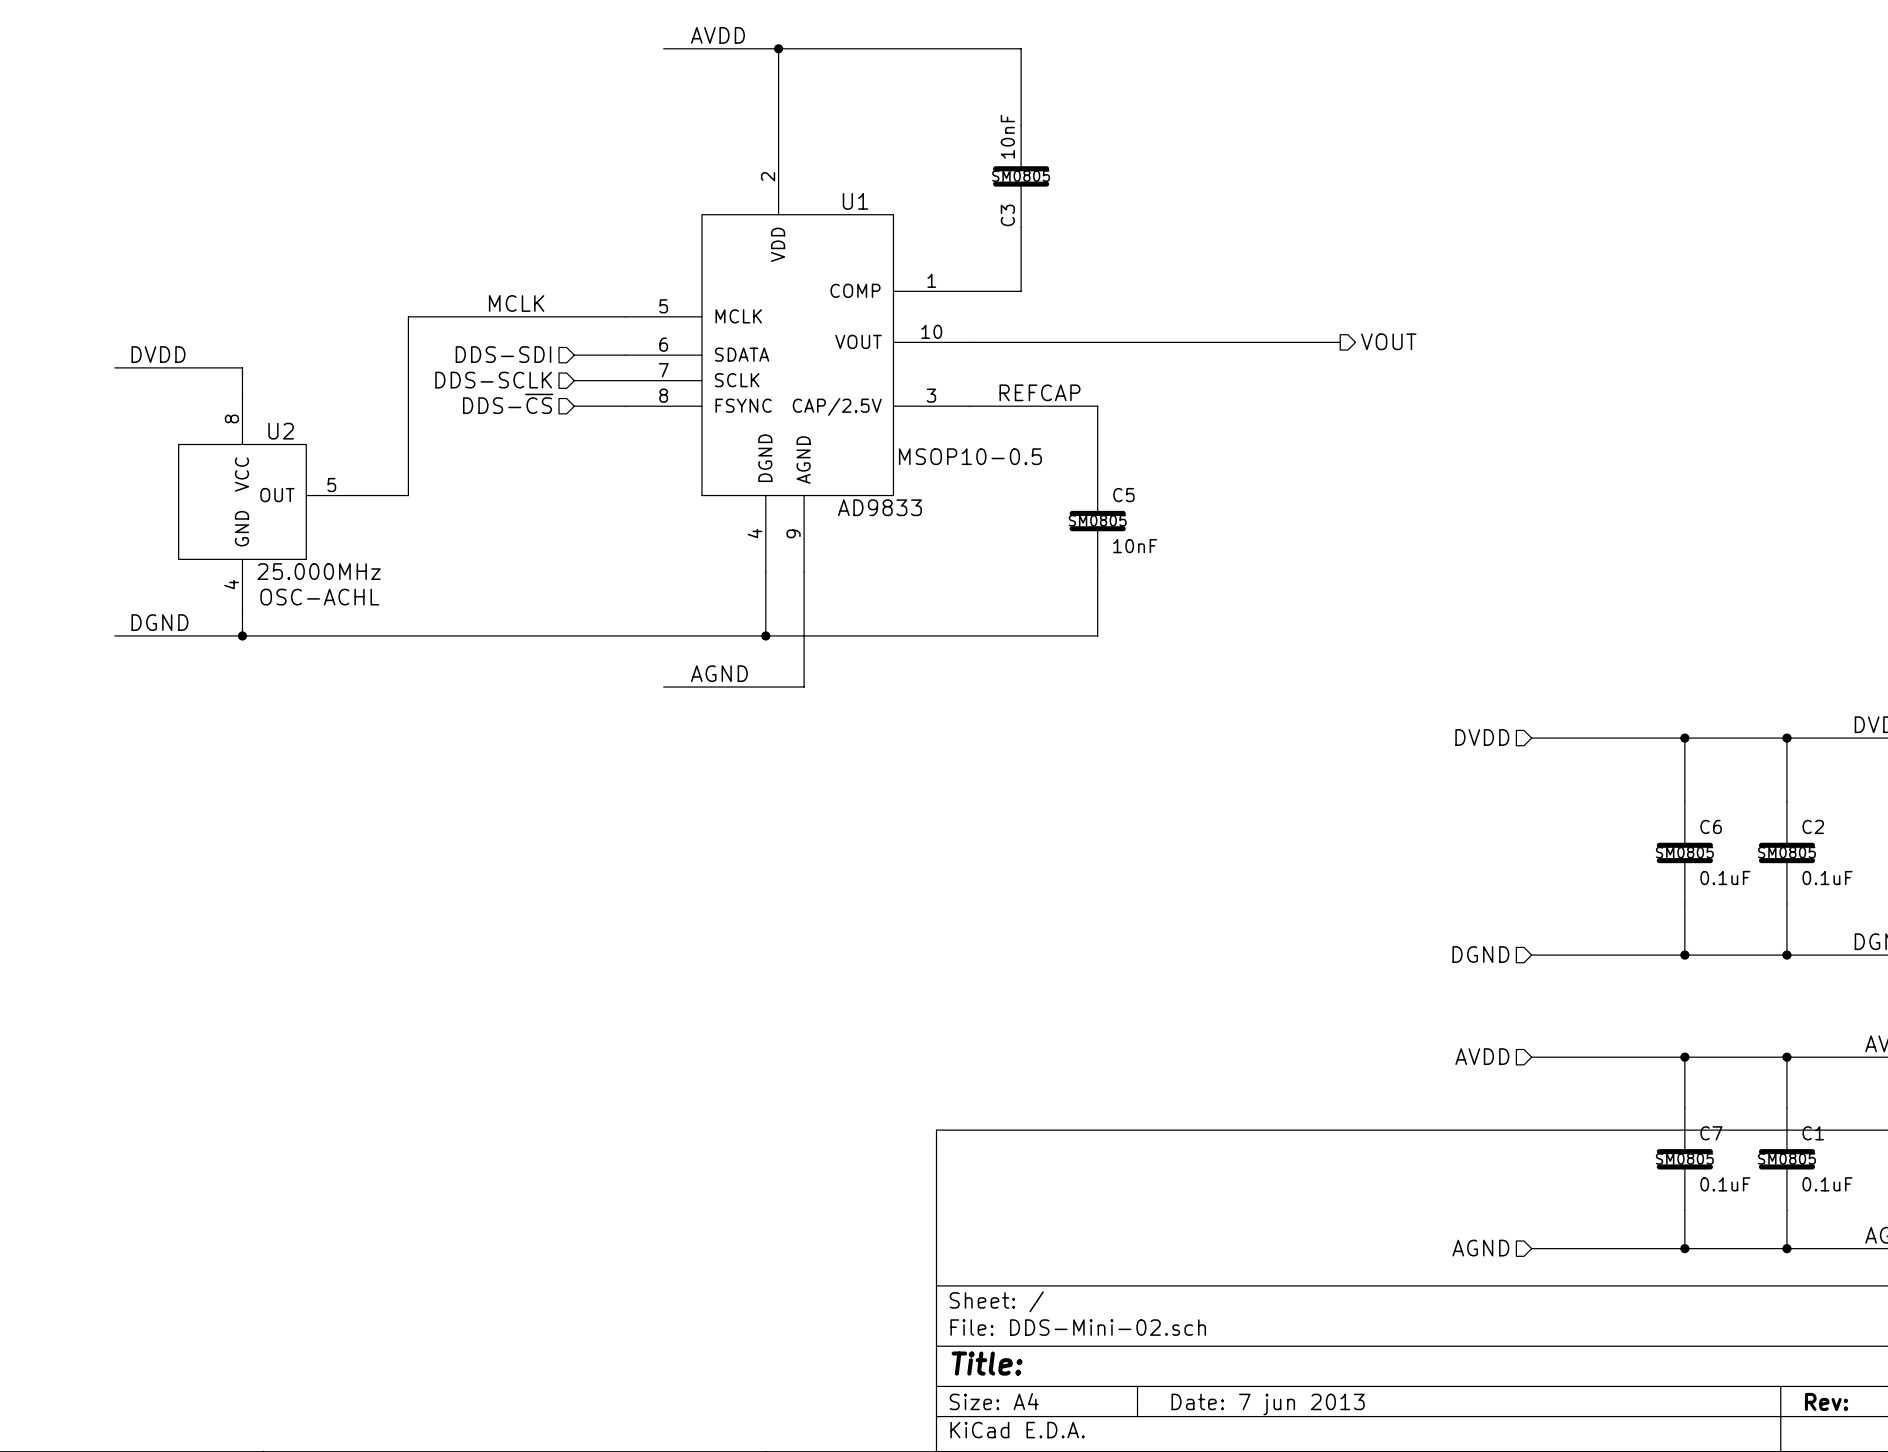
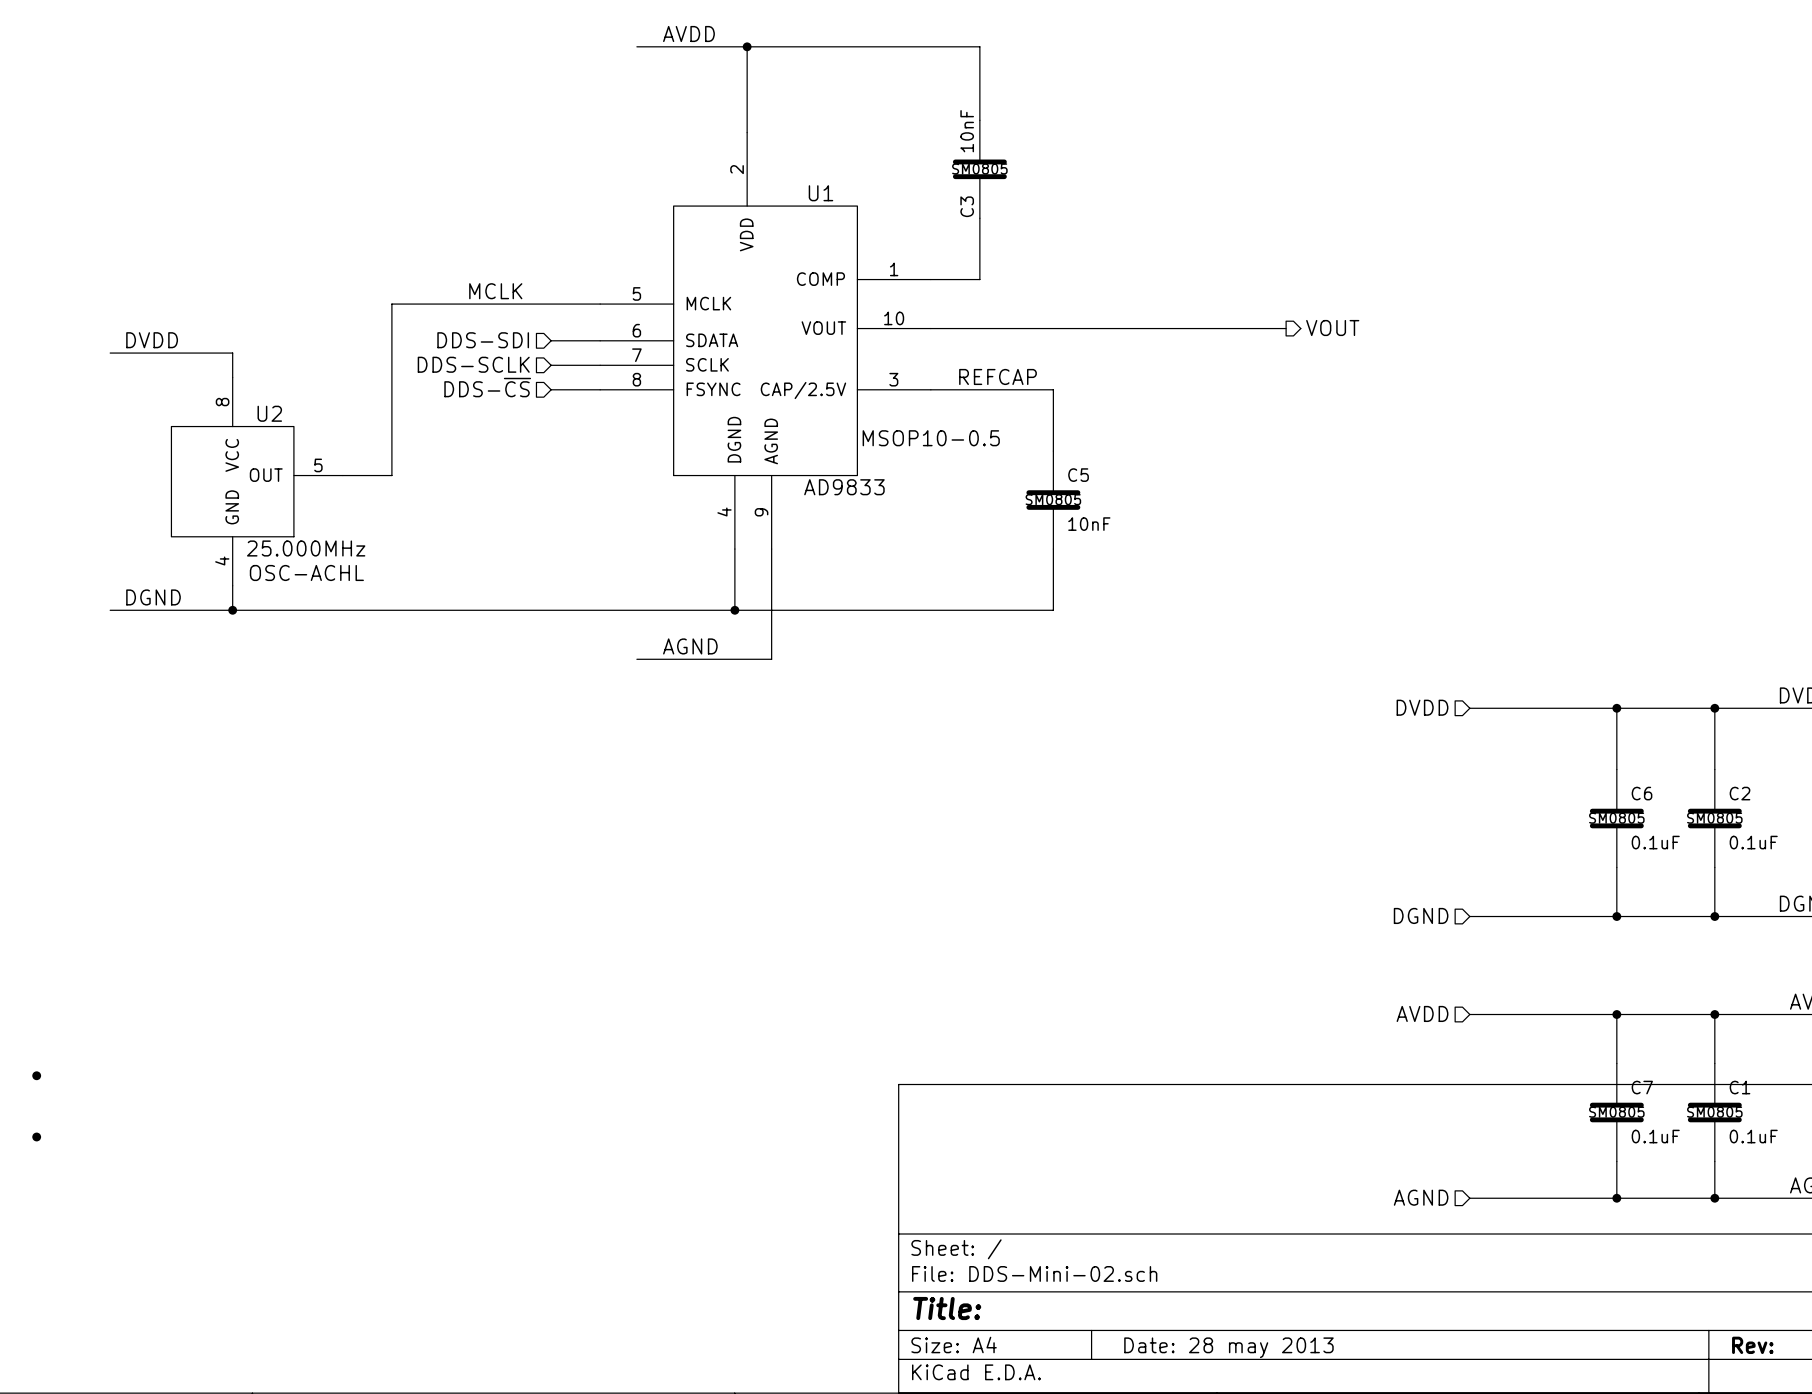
junction: none -> (36, 1075)
junction: none -> (36, 1137)
title block: Date: 7 jun 2013 (1268, 1404) -> Date: 28 may 2013 (1228, 1347)

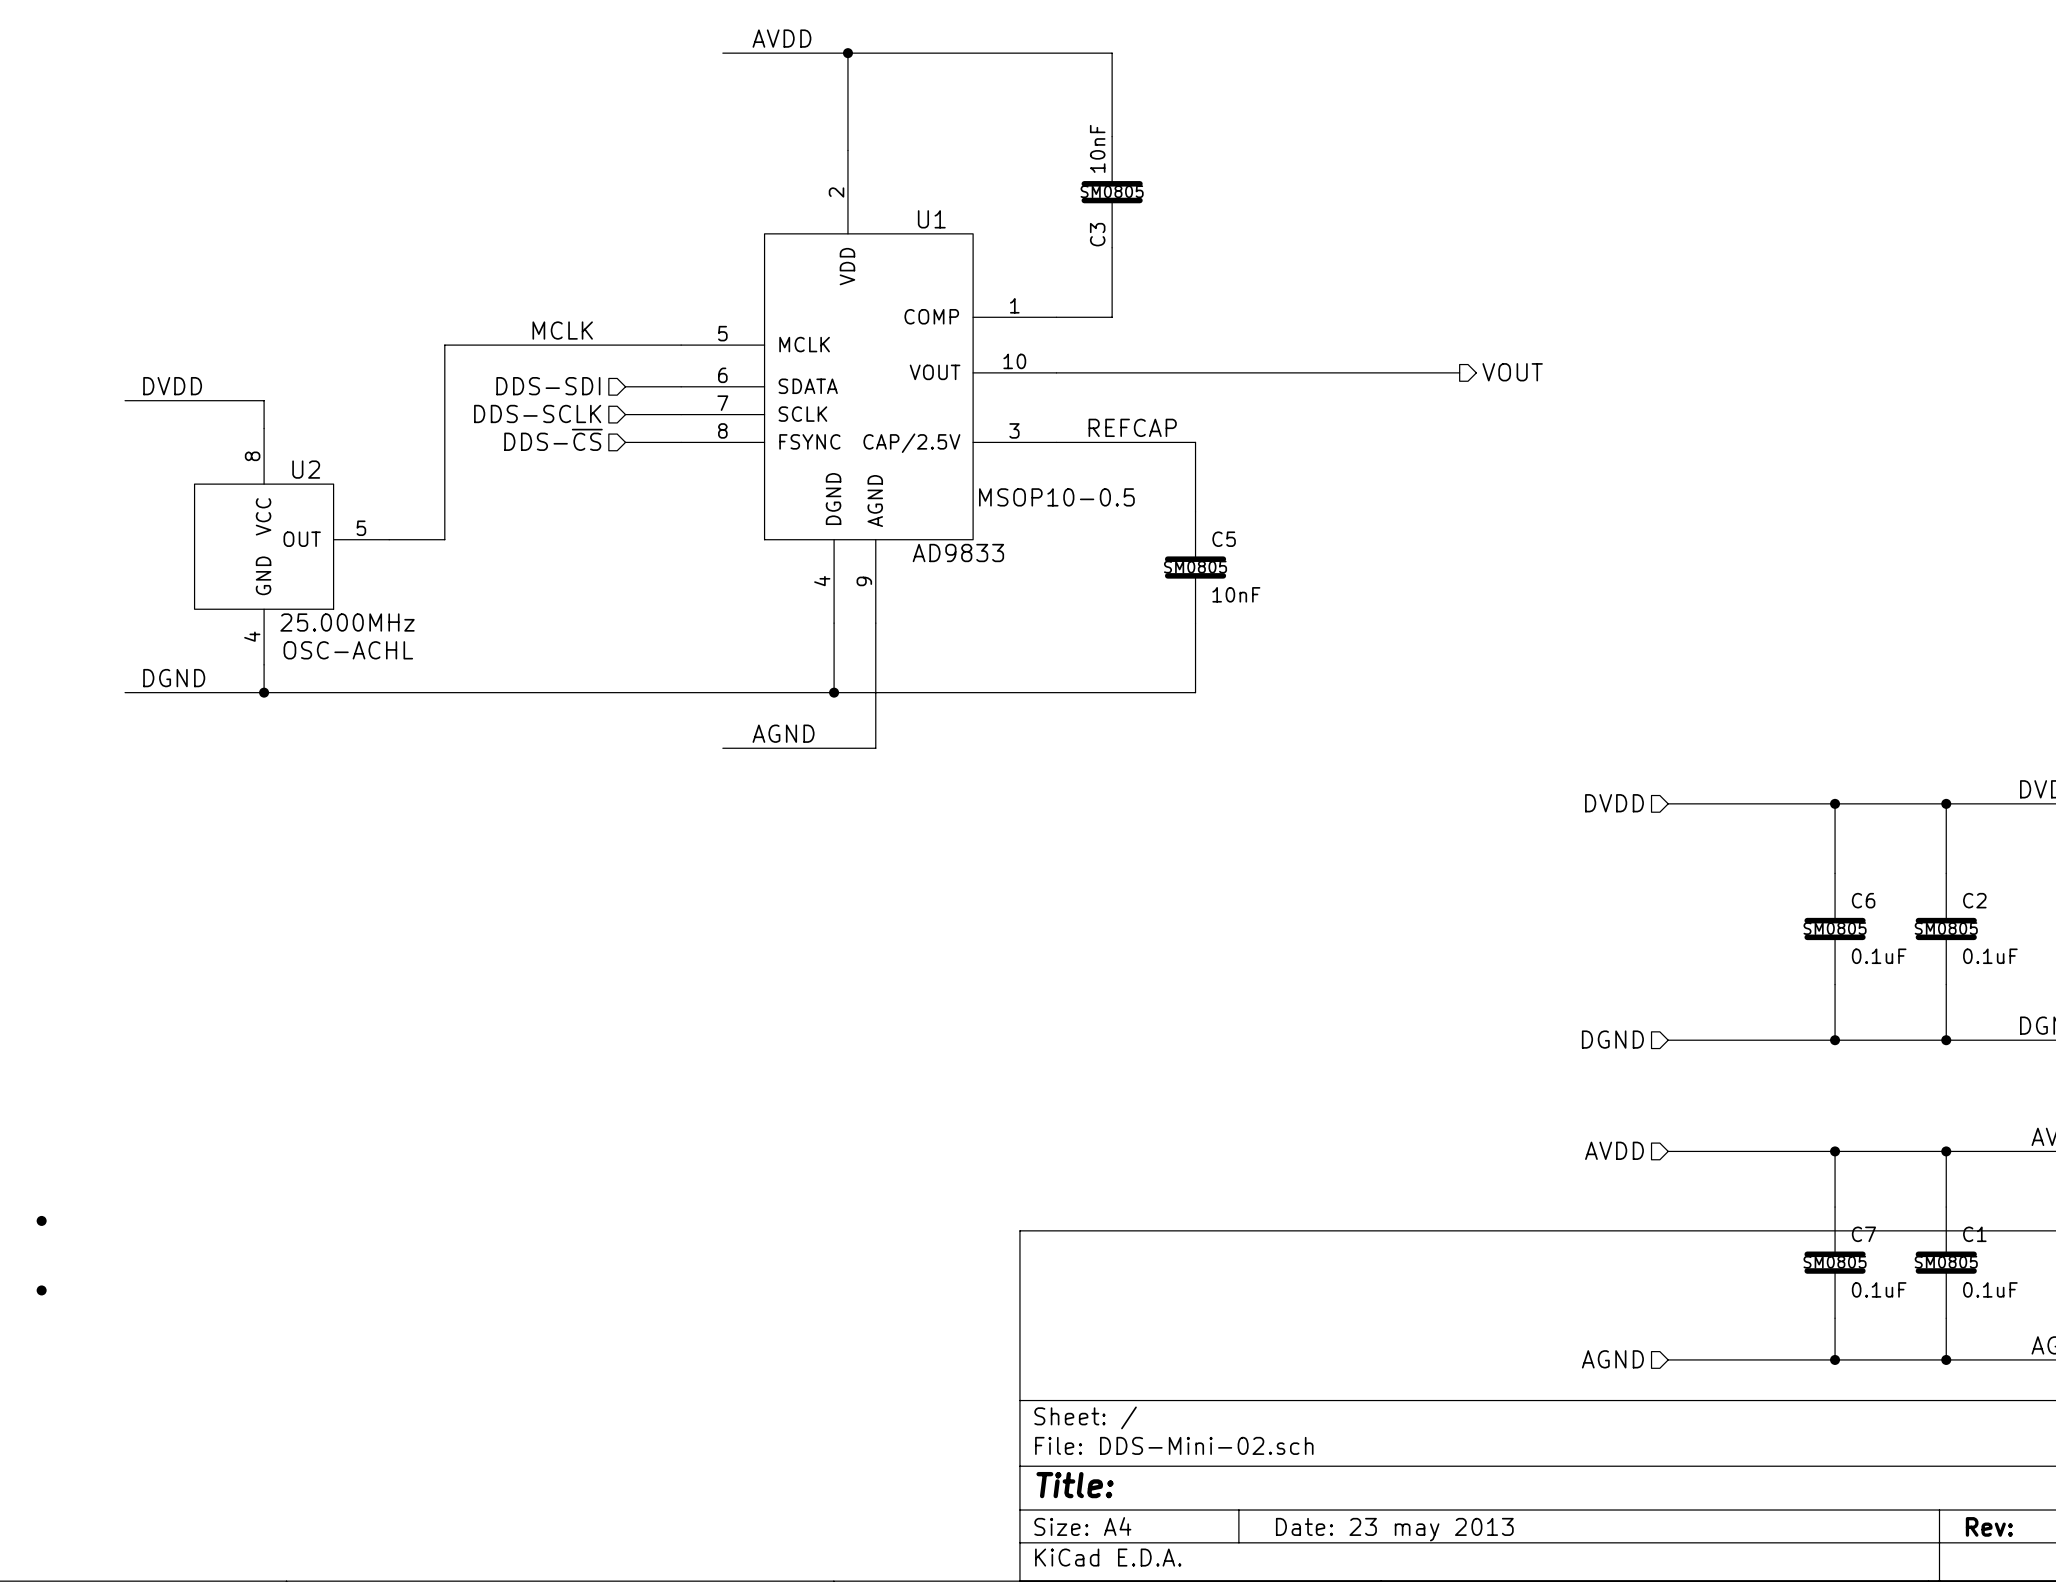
title block: Date: 28 may 2013 (1228, 1347) -> Date: 23 may 2013 (1394, 1529)

